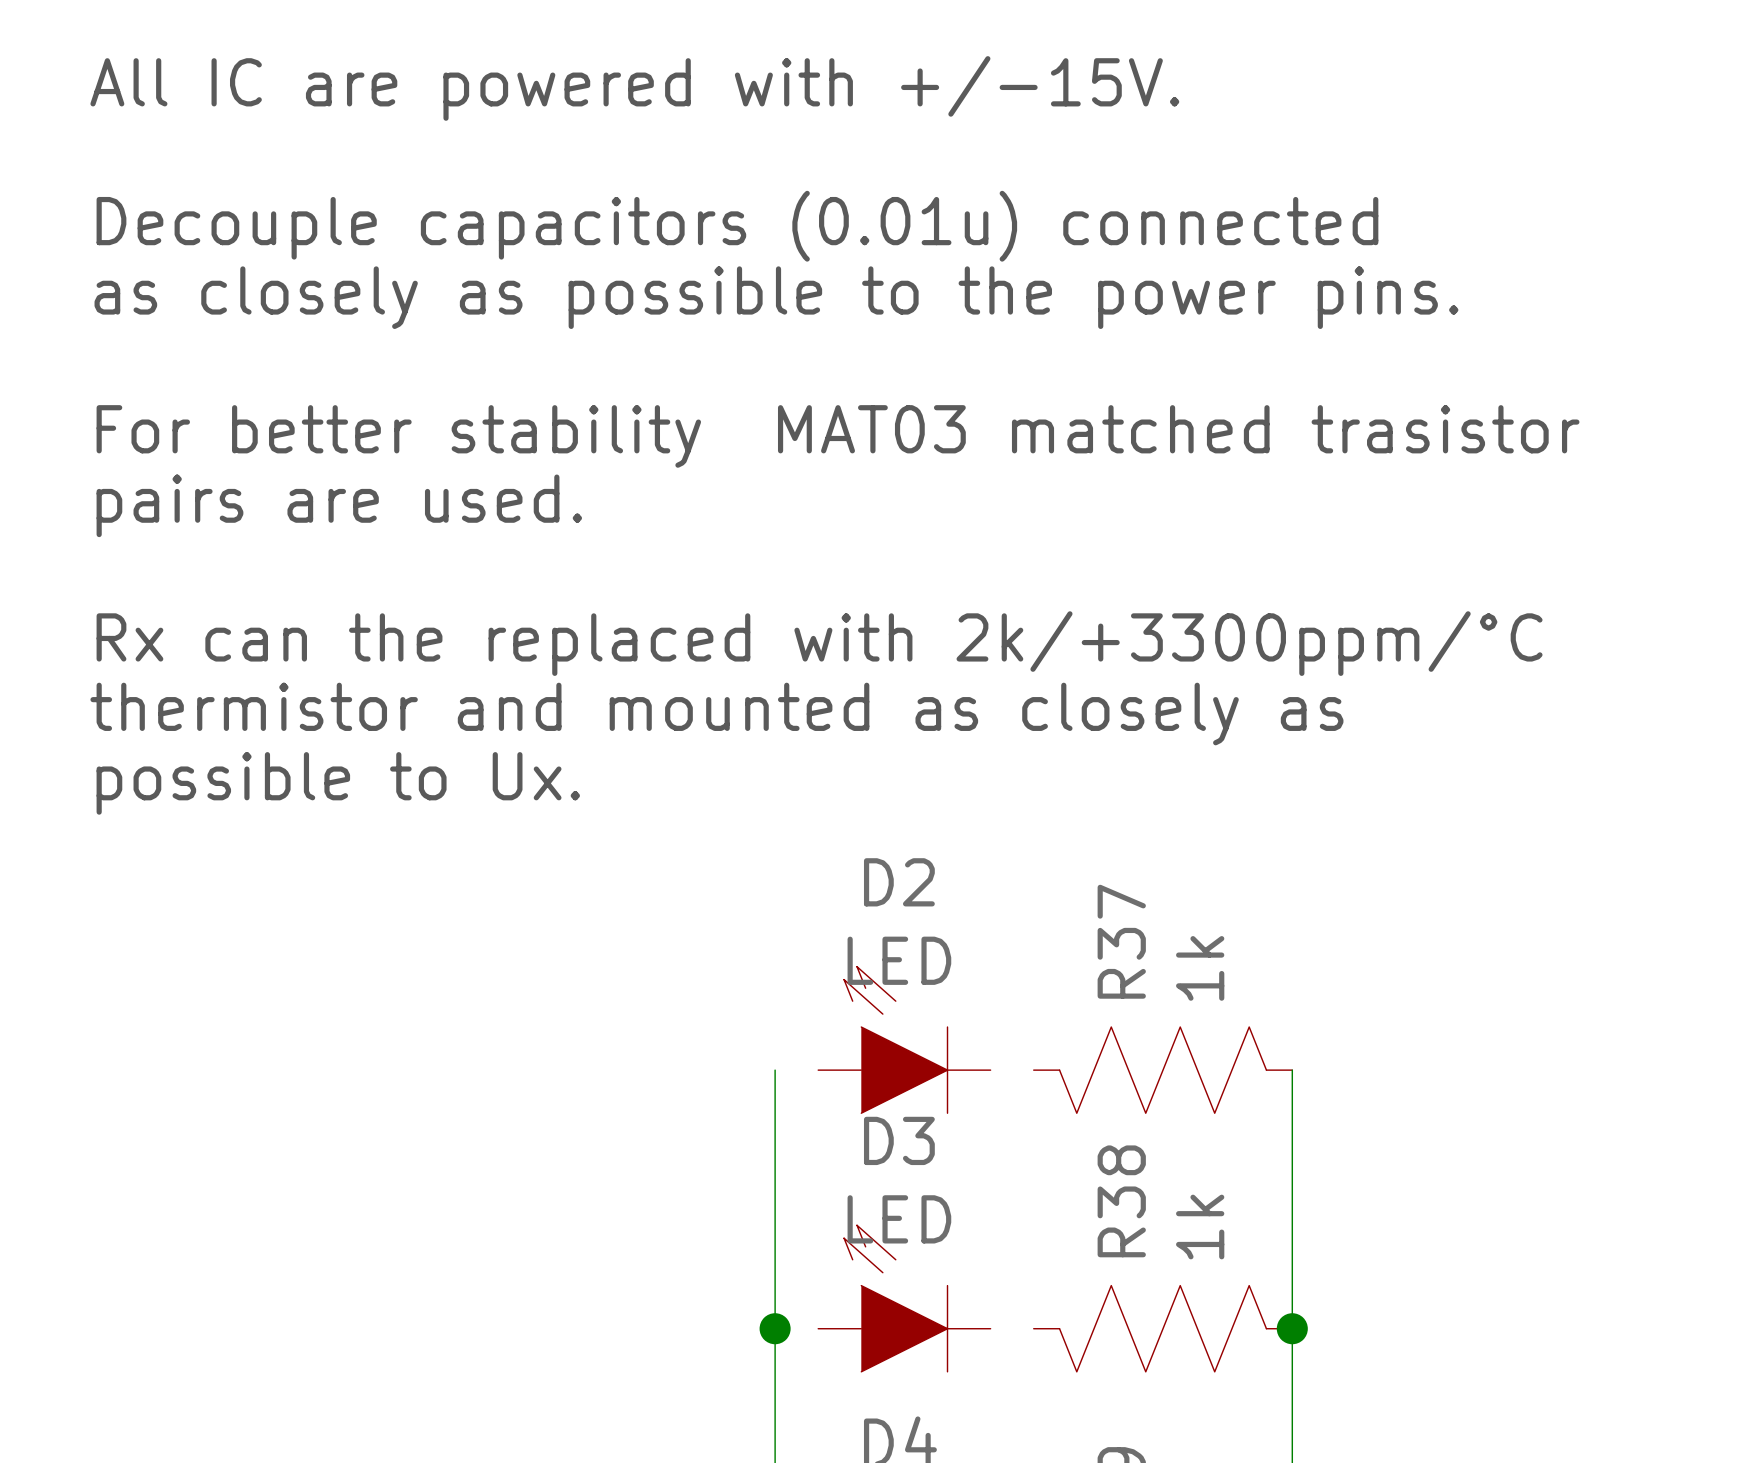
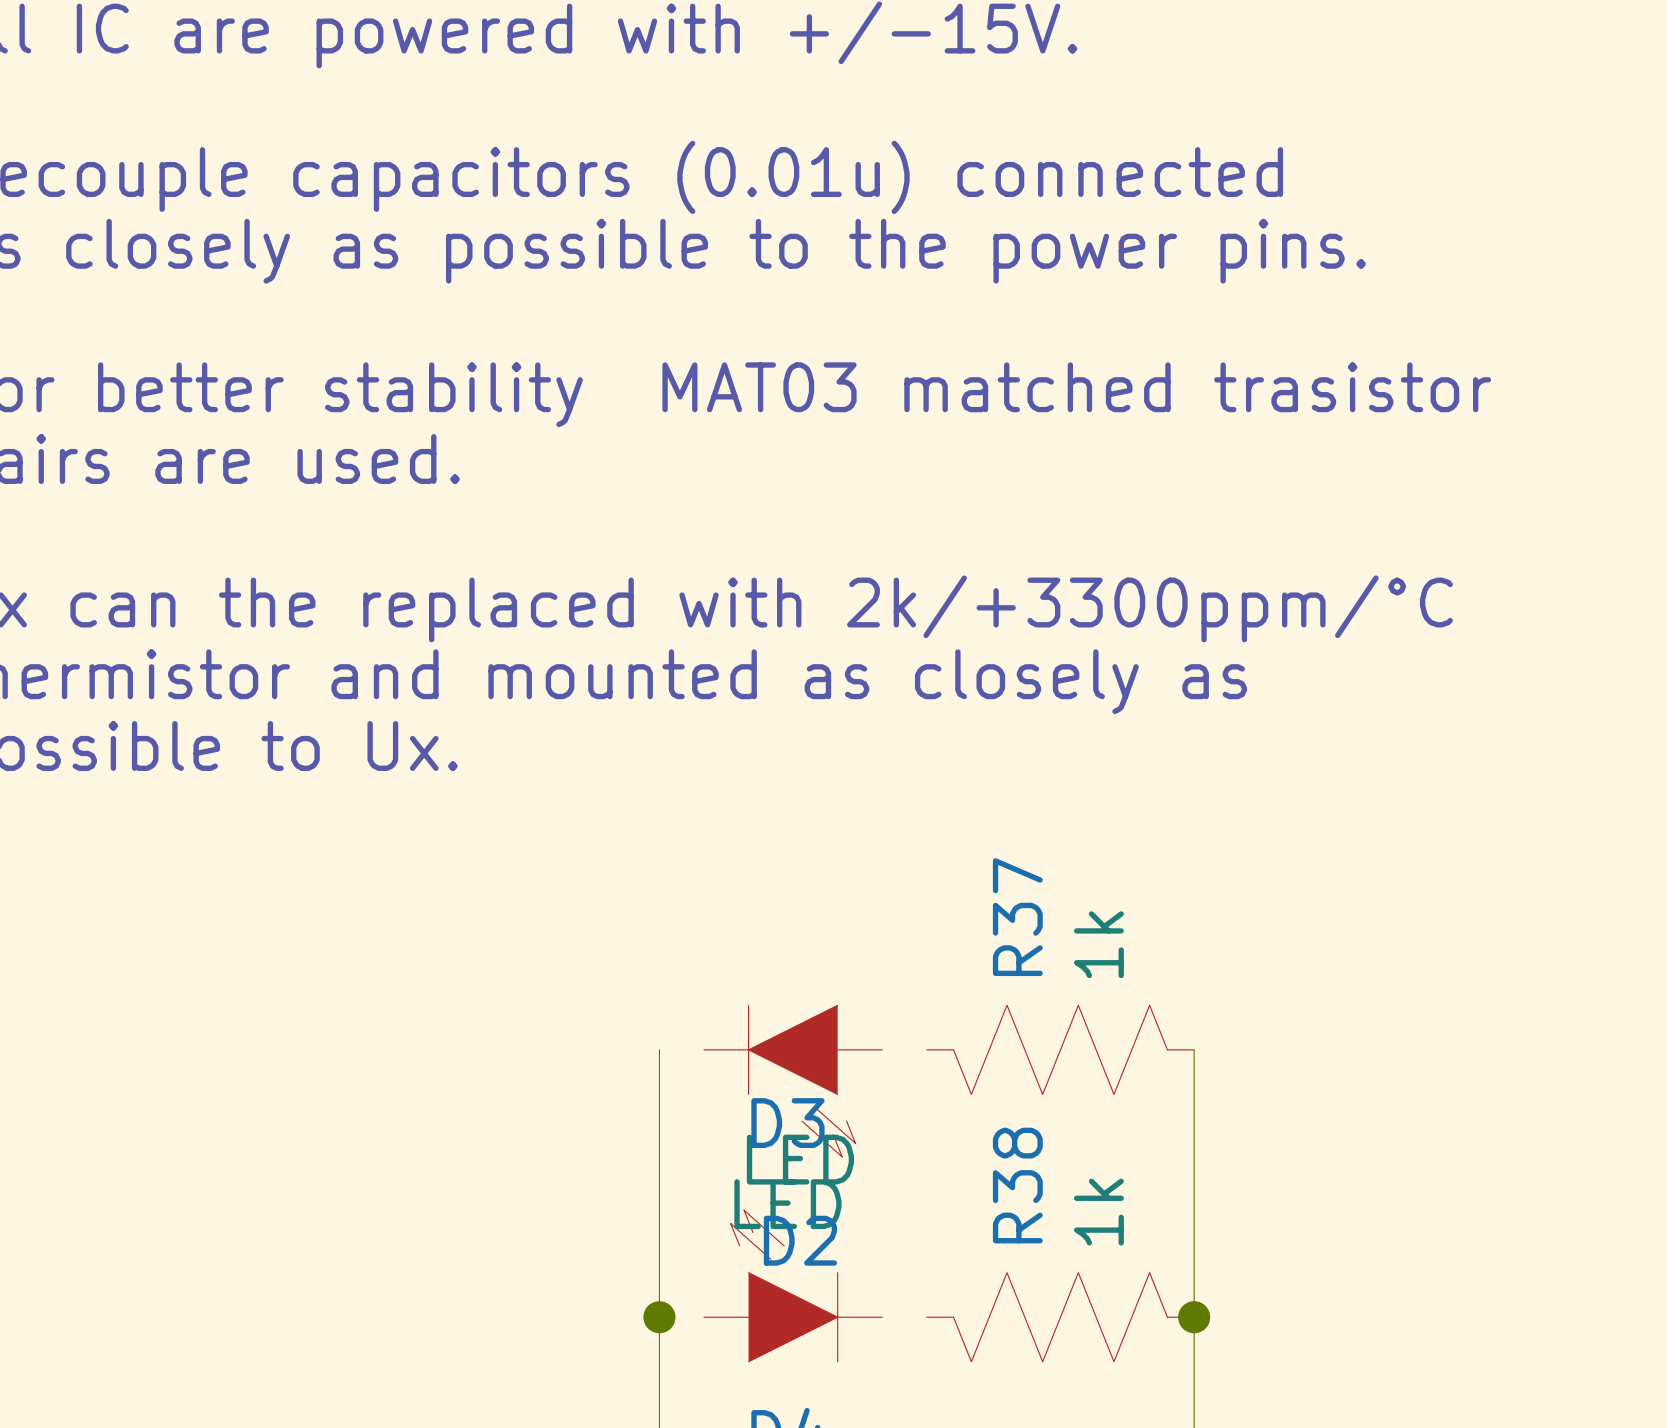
D2 rotation: 0° (895, 1039) -> 180° (802, 1081)

